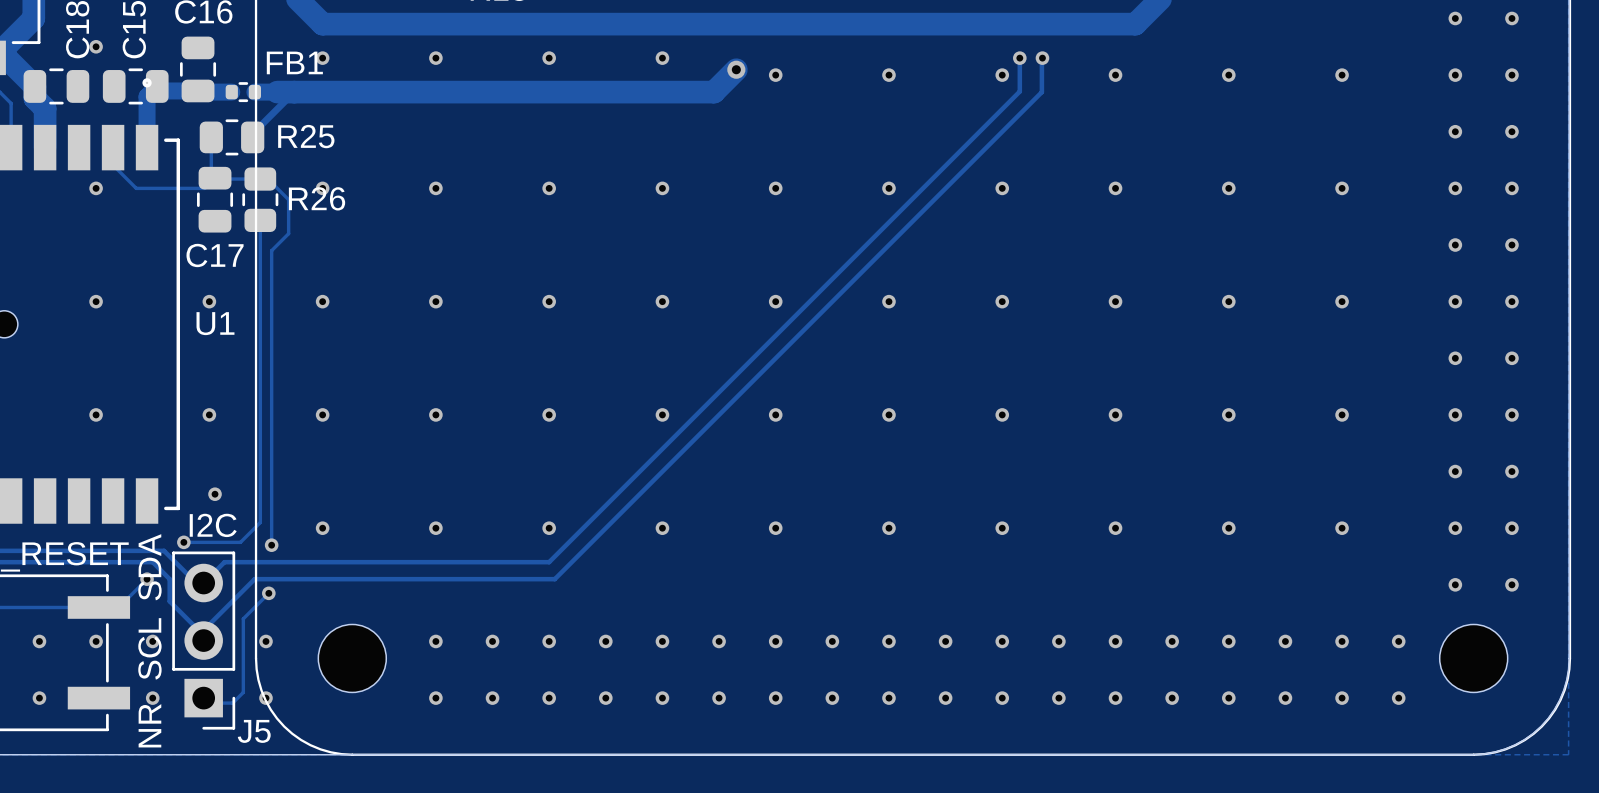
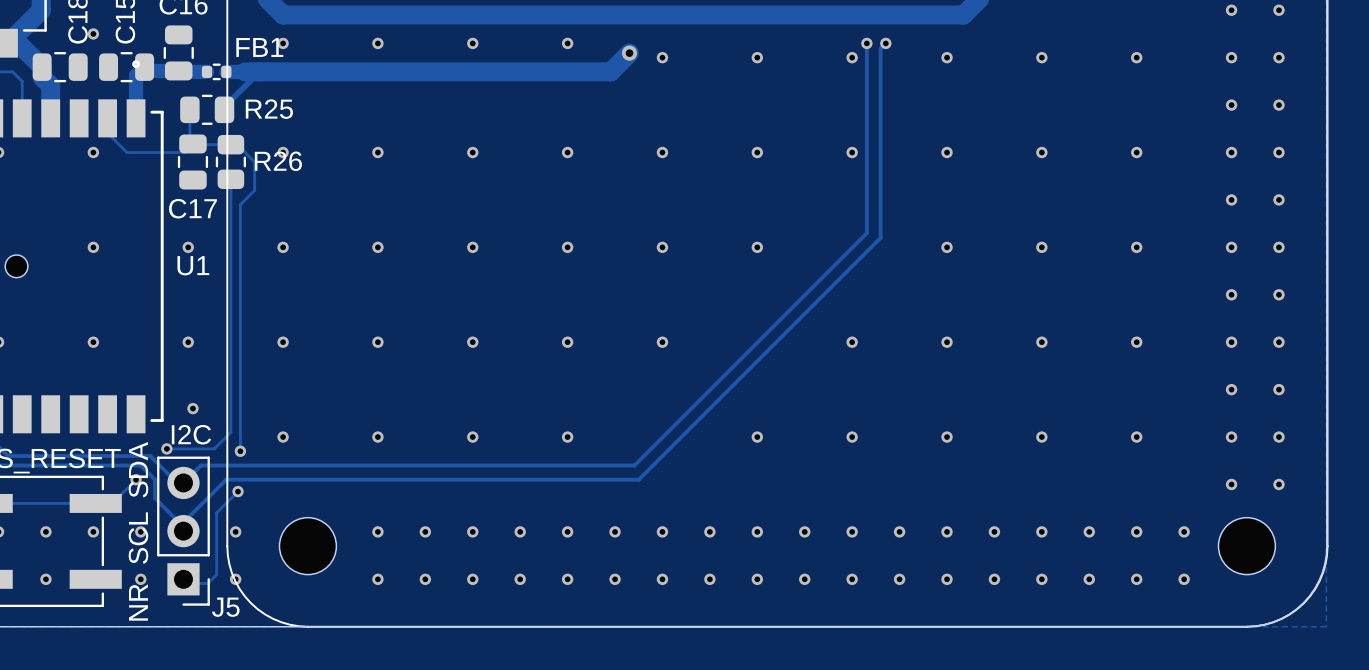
track: (1041, 58) (1041, 92) (554, 579) -> (885, 43) (880, 48) (880, 237) (638, 479) (477, 479)
track: (1019, 91) (549, 562) -> (866, 71) (866, 233) (634, 465) (472, 465)
via: (1002, 301) -> none
via: (888, 414) -> none
via: (775, 528) -> none

